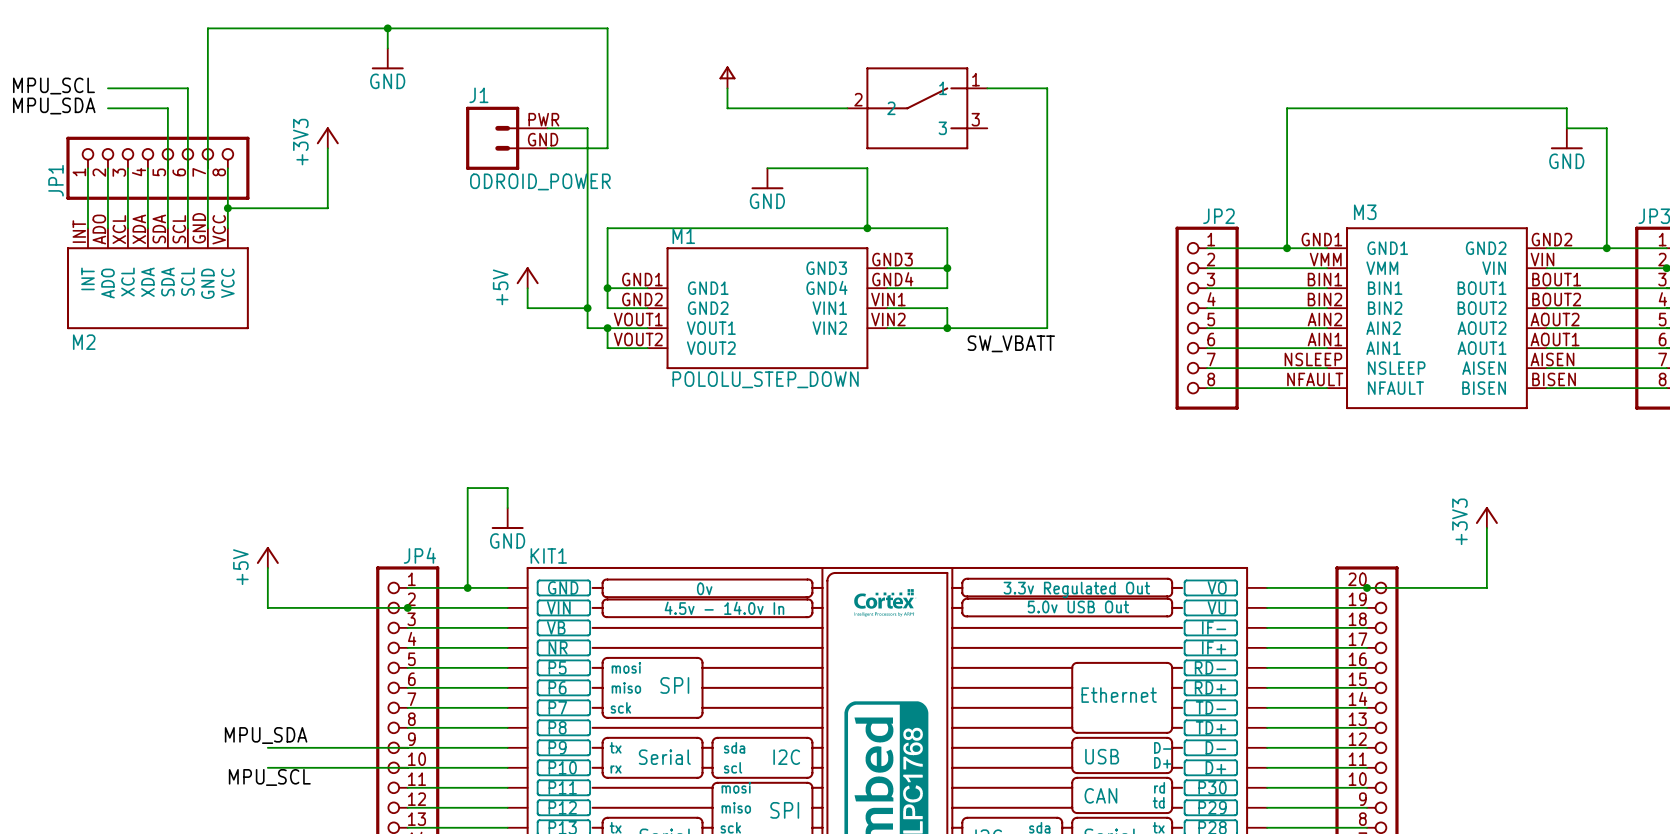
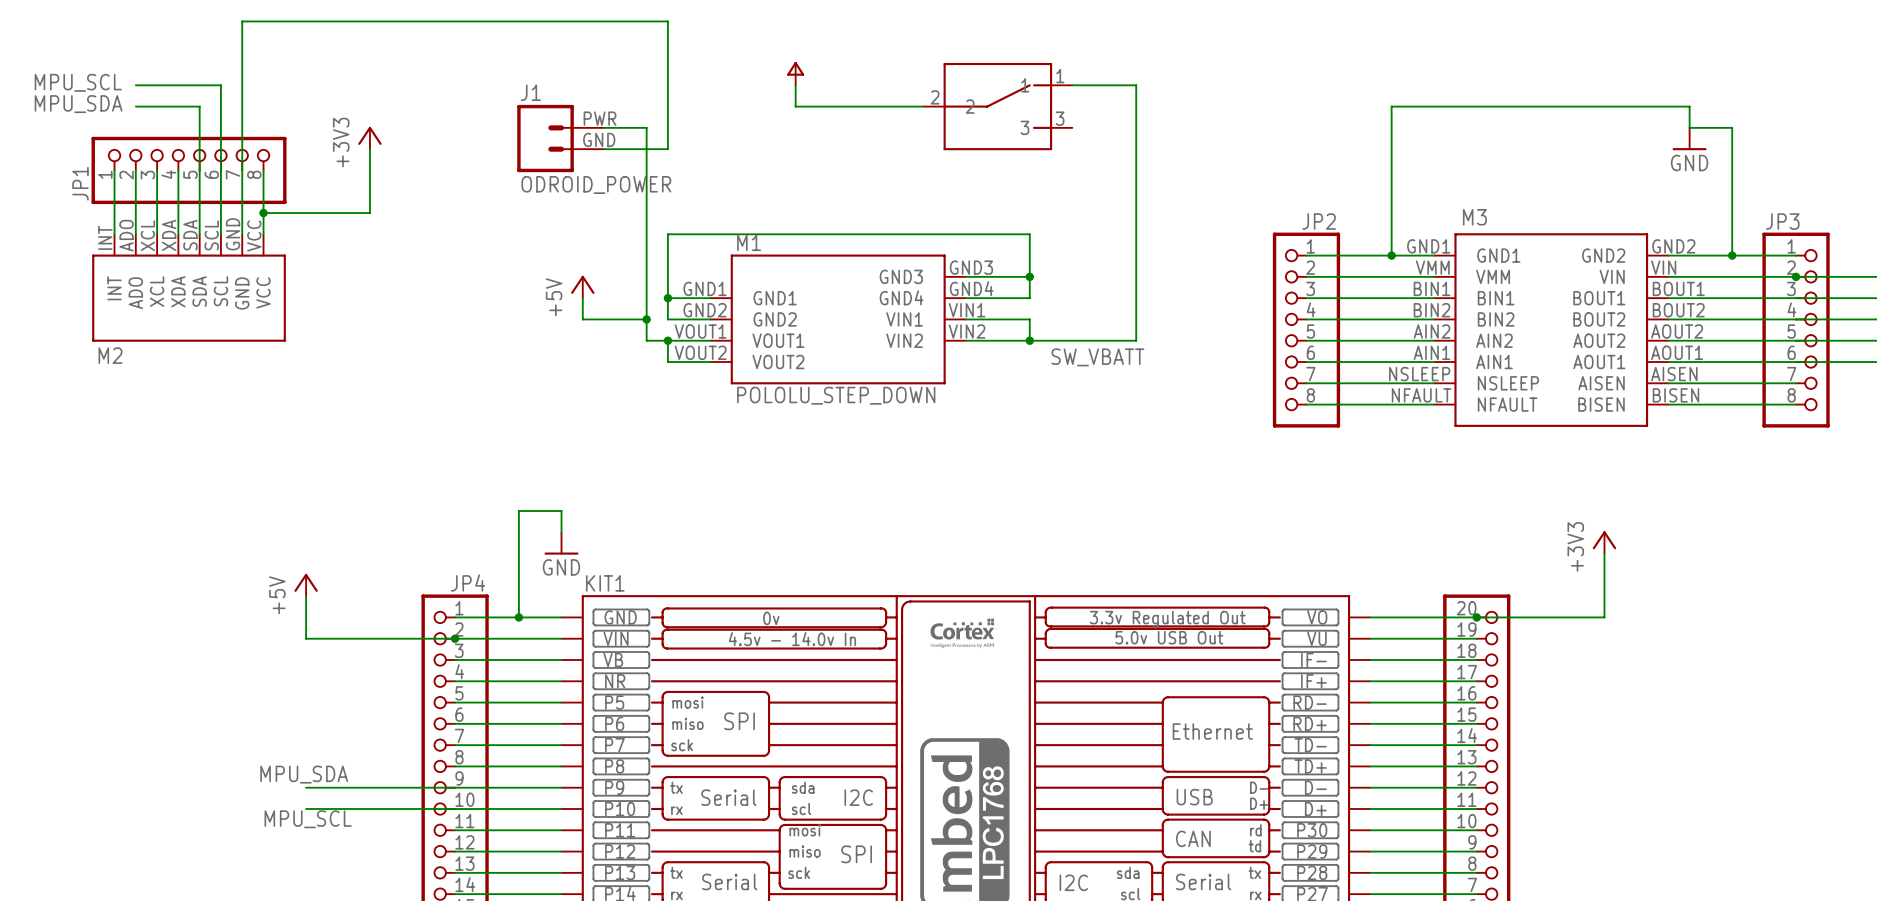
wire: (387, 28) (387, 48) -> none
junction: (387, 28) -> none
power symbol: GND (387, 58) -> none
wire: (767, 168) (867, 168) (867, 228) -> none
power symbol: GND (767, 178) -> none
junction: (867, 228) -> none

